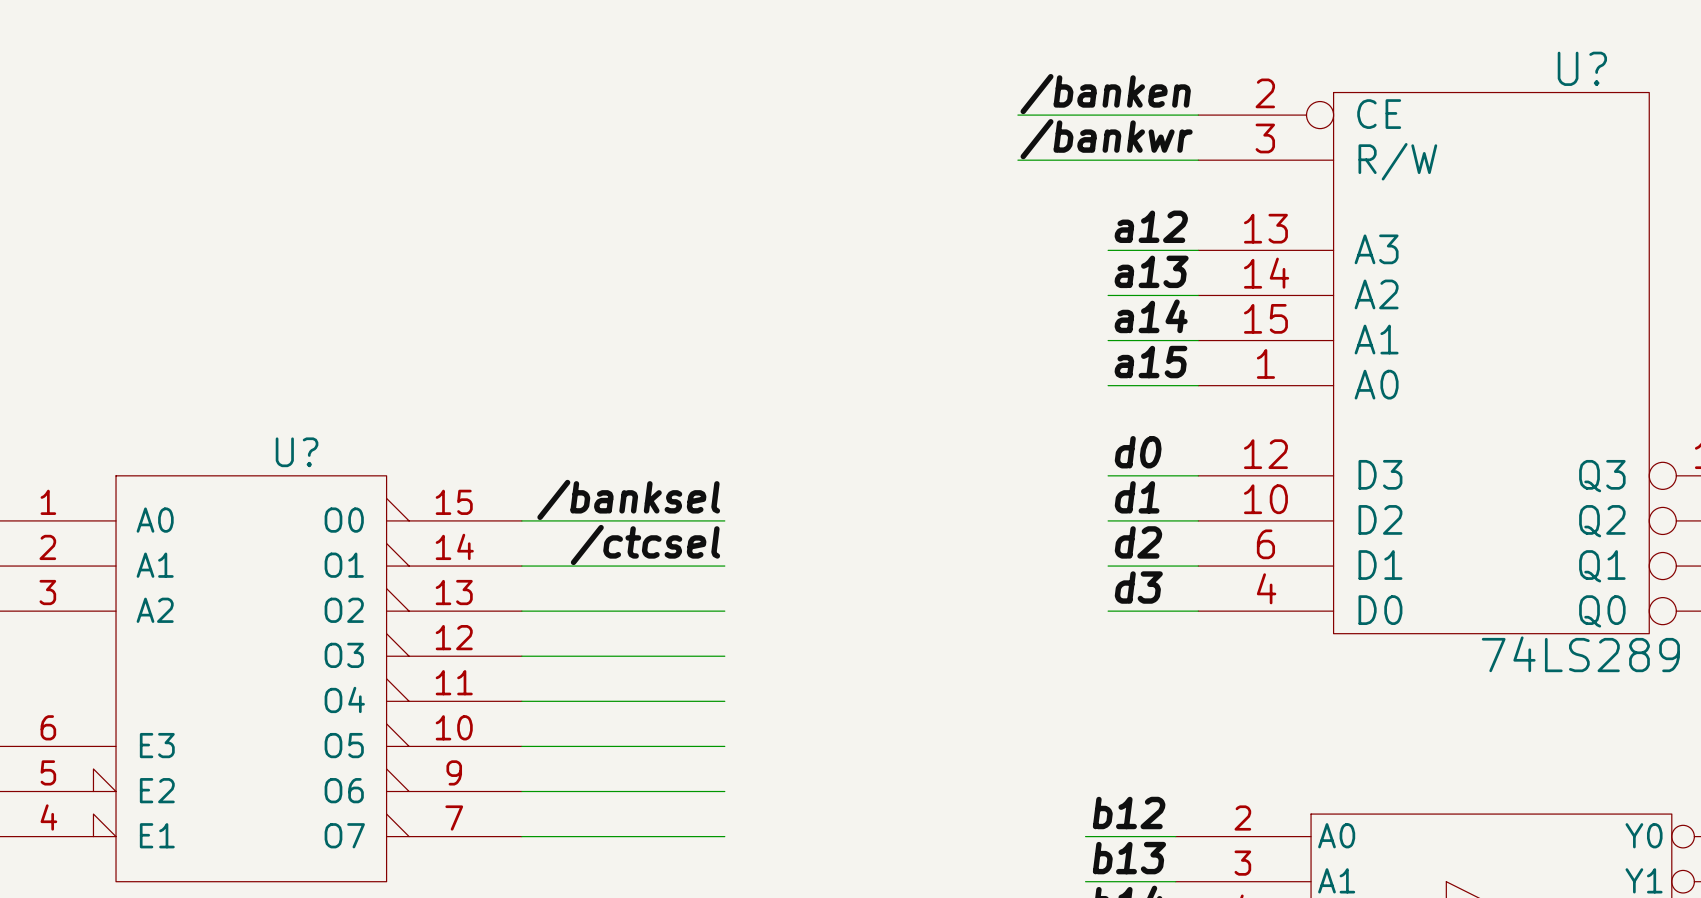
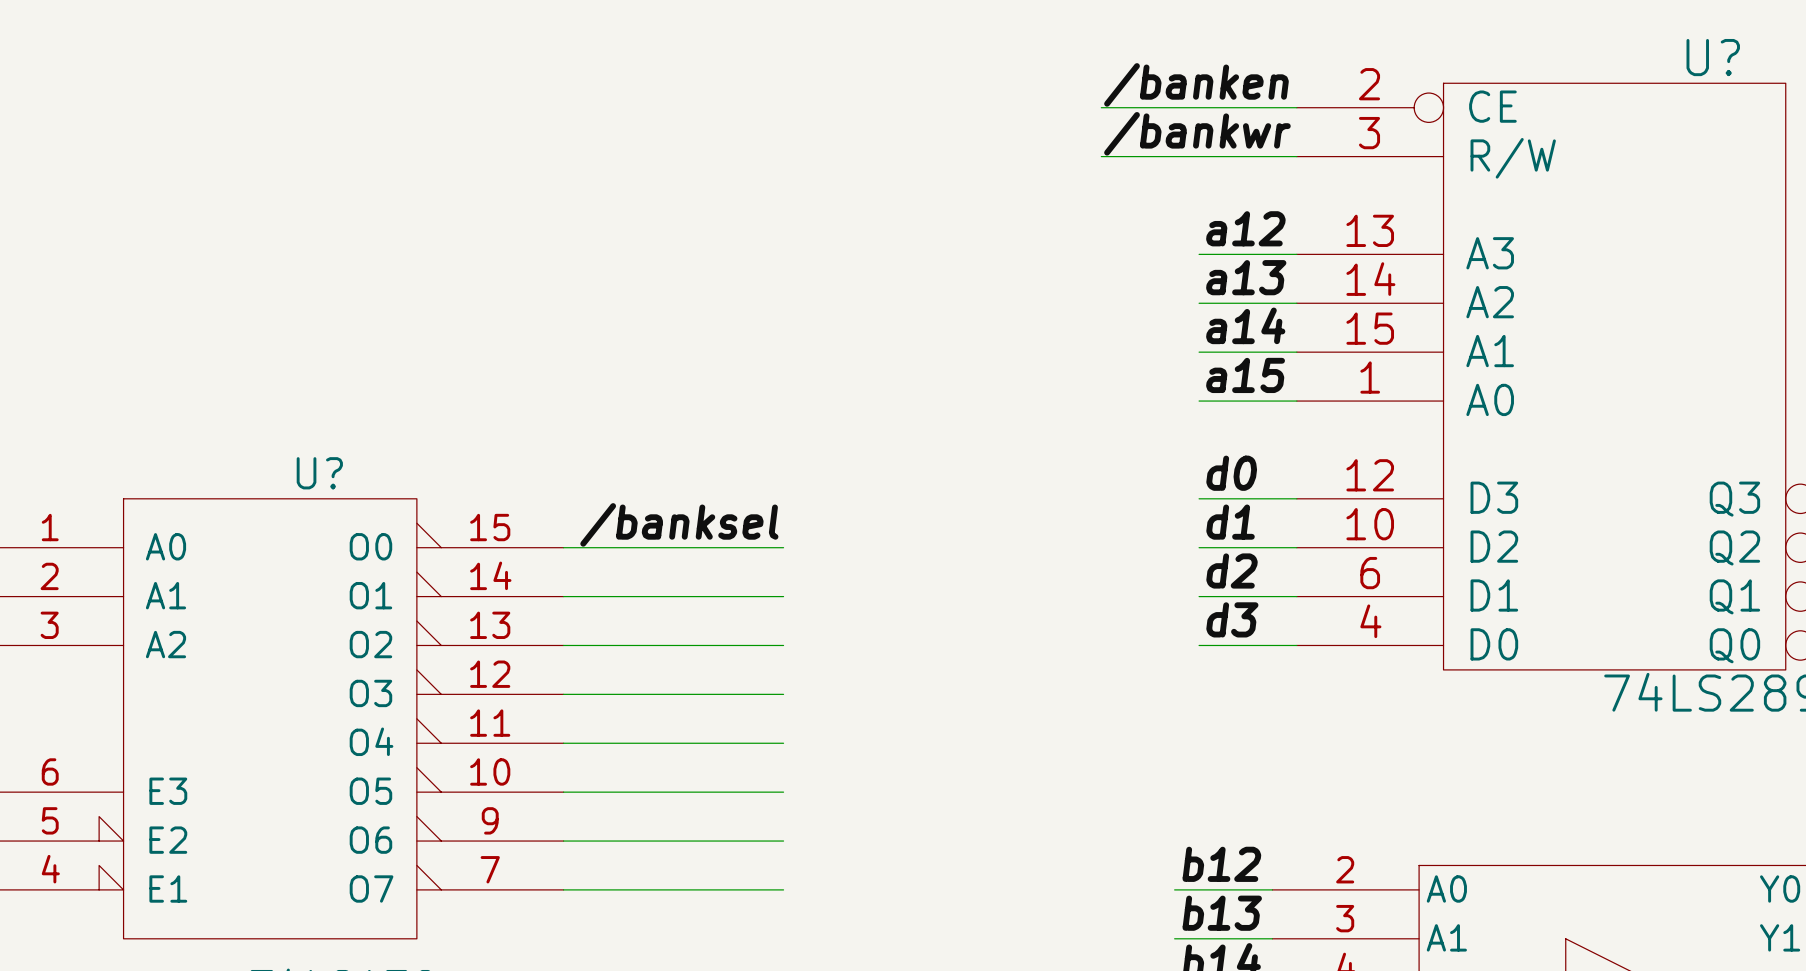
label: /ctcsel (645, 545) -> none

